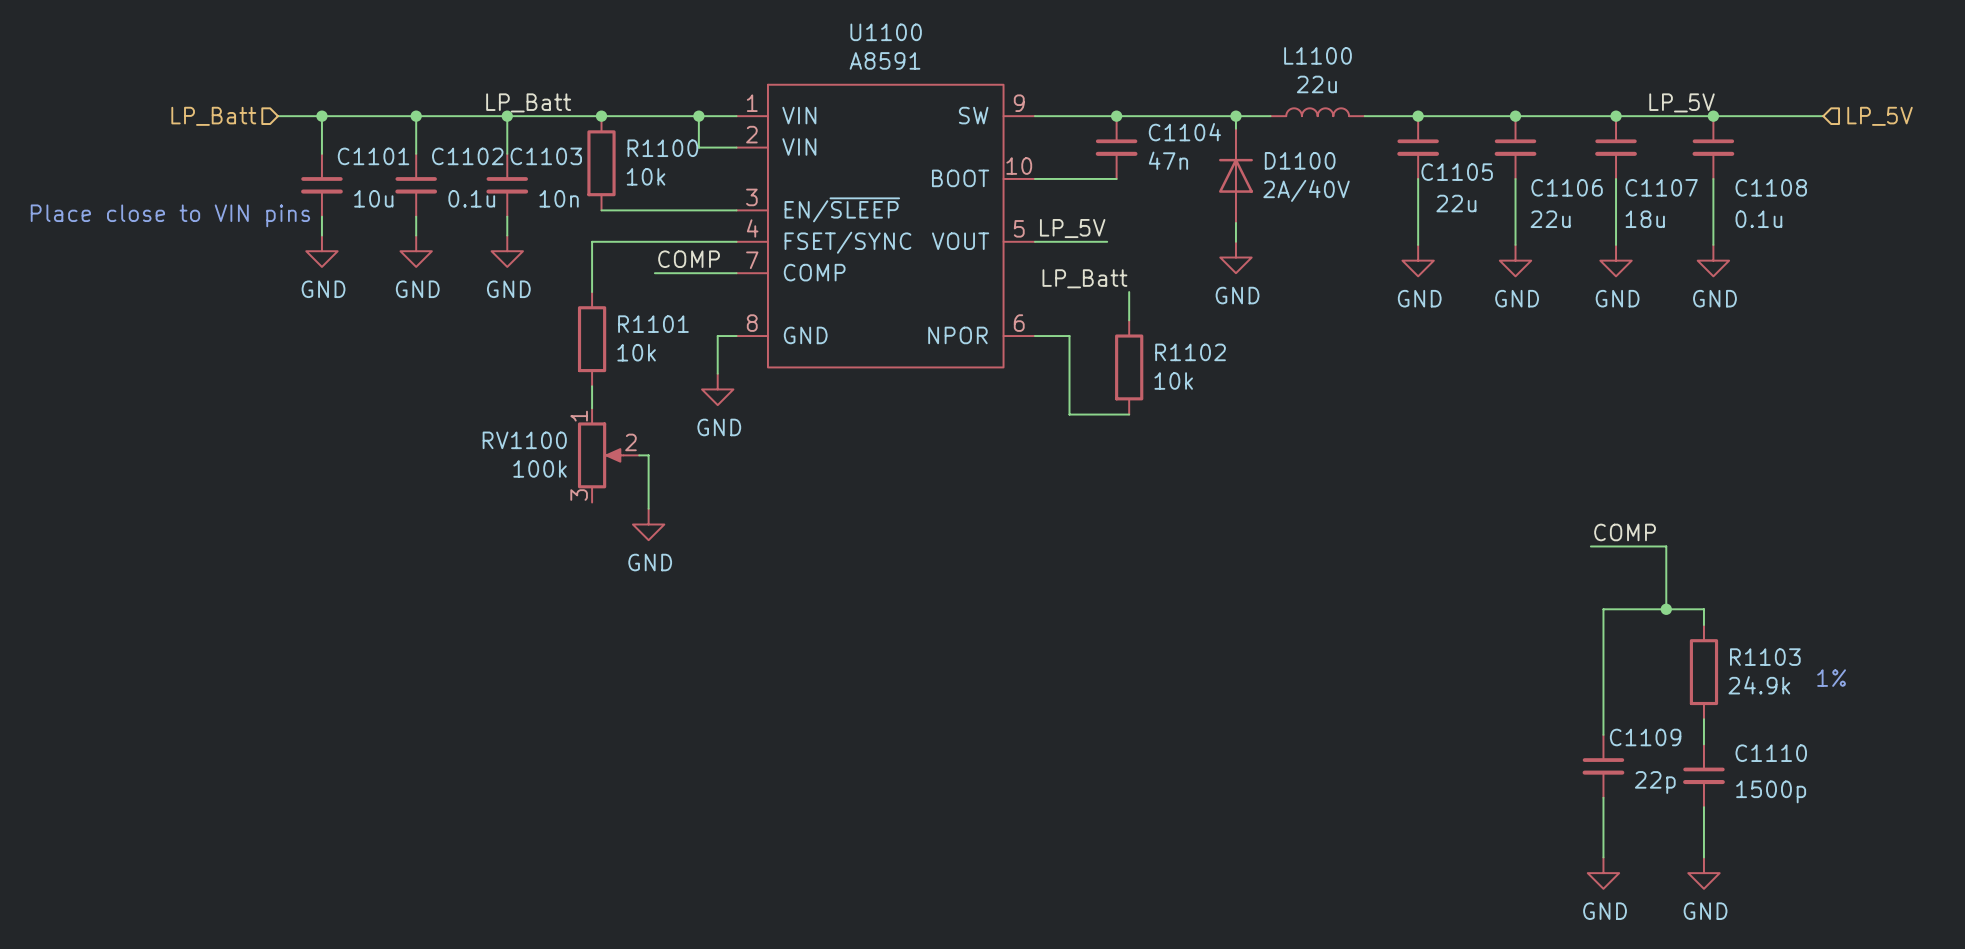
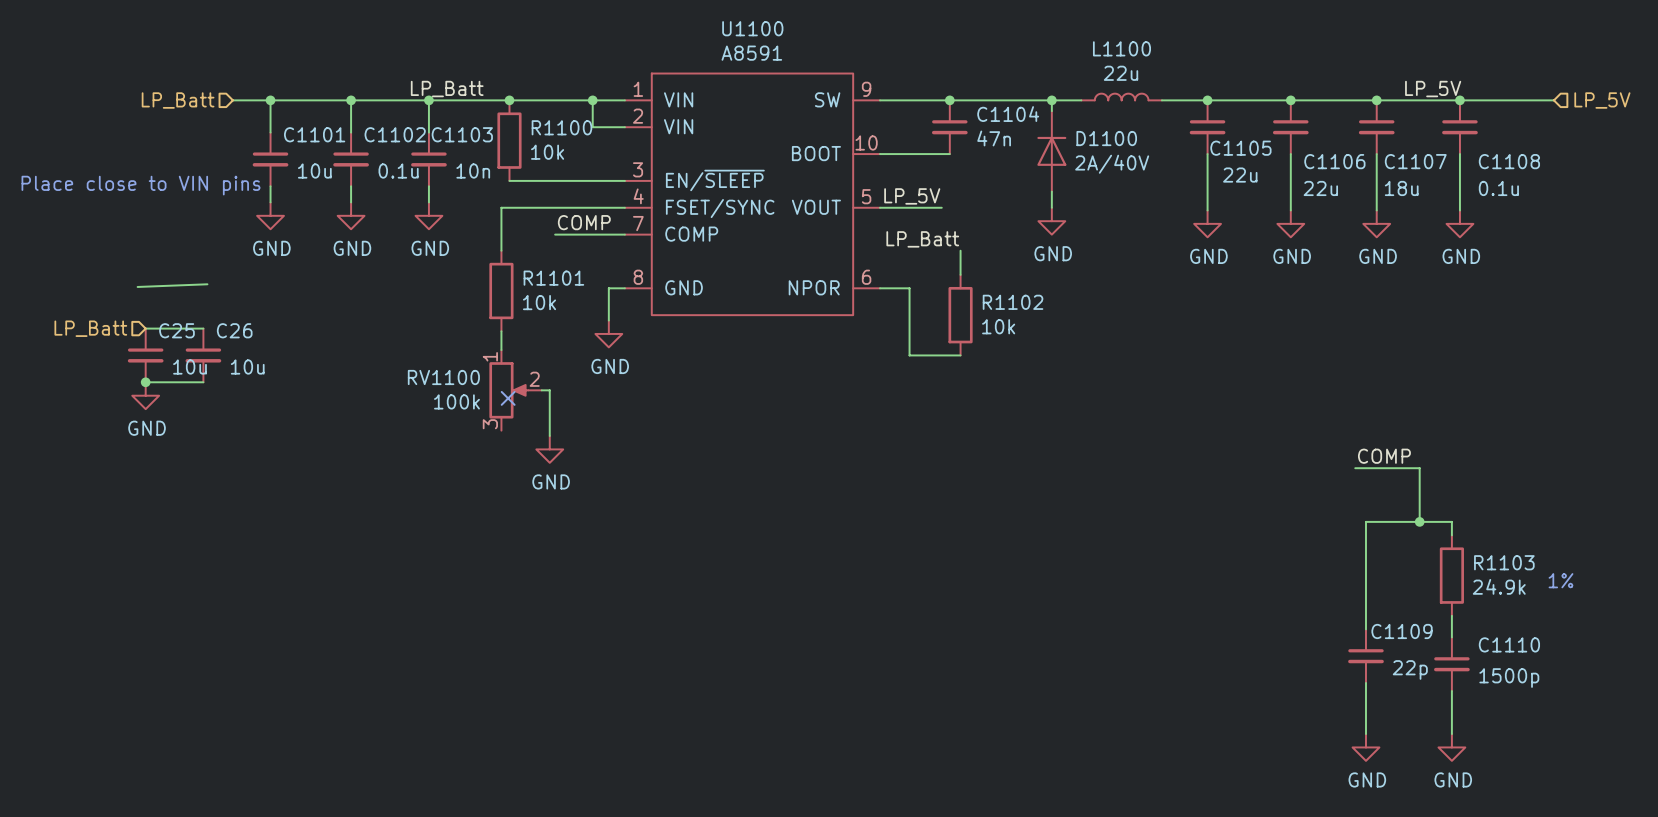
wire: none -> (207, 284) (137, 286)
hierarchical label: none -> LP_Batt (90, 328)
wire: none -> (145, 328) (203, 328)
C25: none -> 10u (145, 355)
C26: none -> 10u (203, 355)
wire: none -> (145, 382) (203, 382)
junction: none -> (145, 382)
power symbol: none -> GND (145, 395)
no-connect mark: none -> (508, 398)

